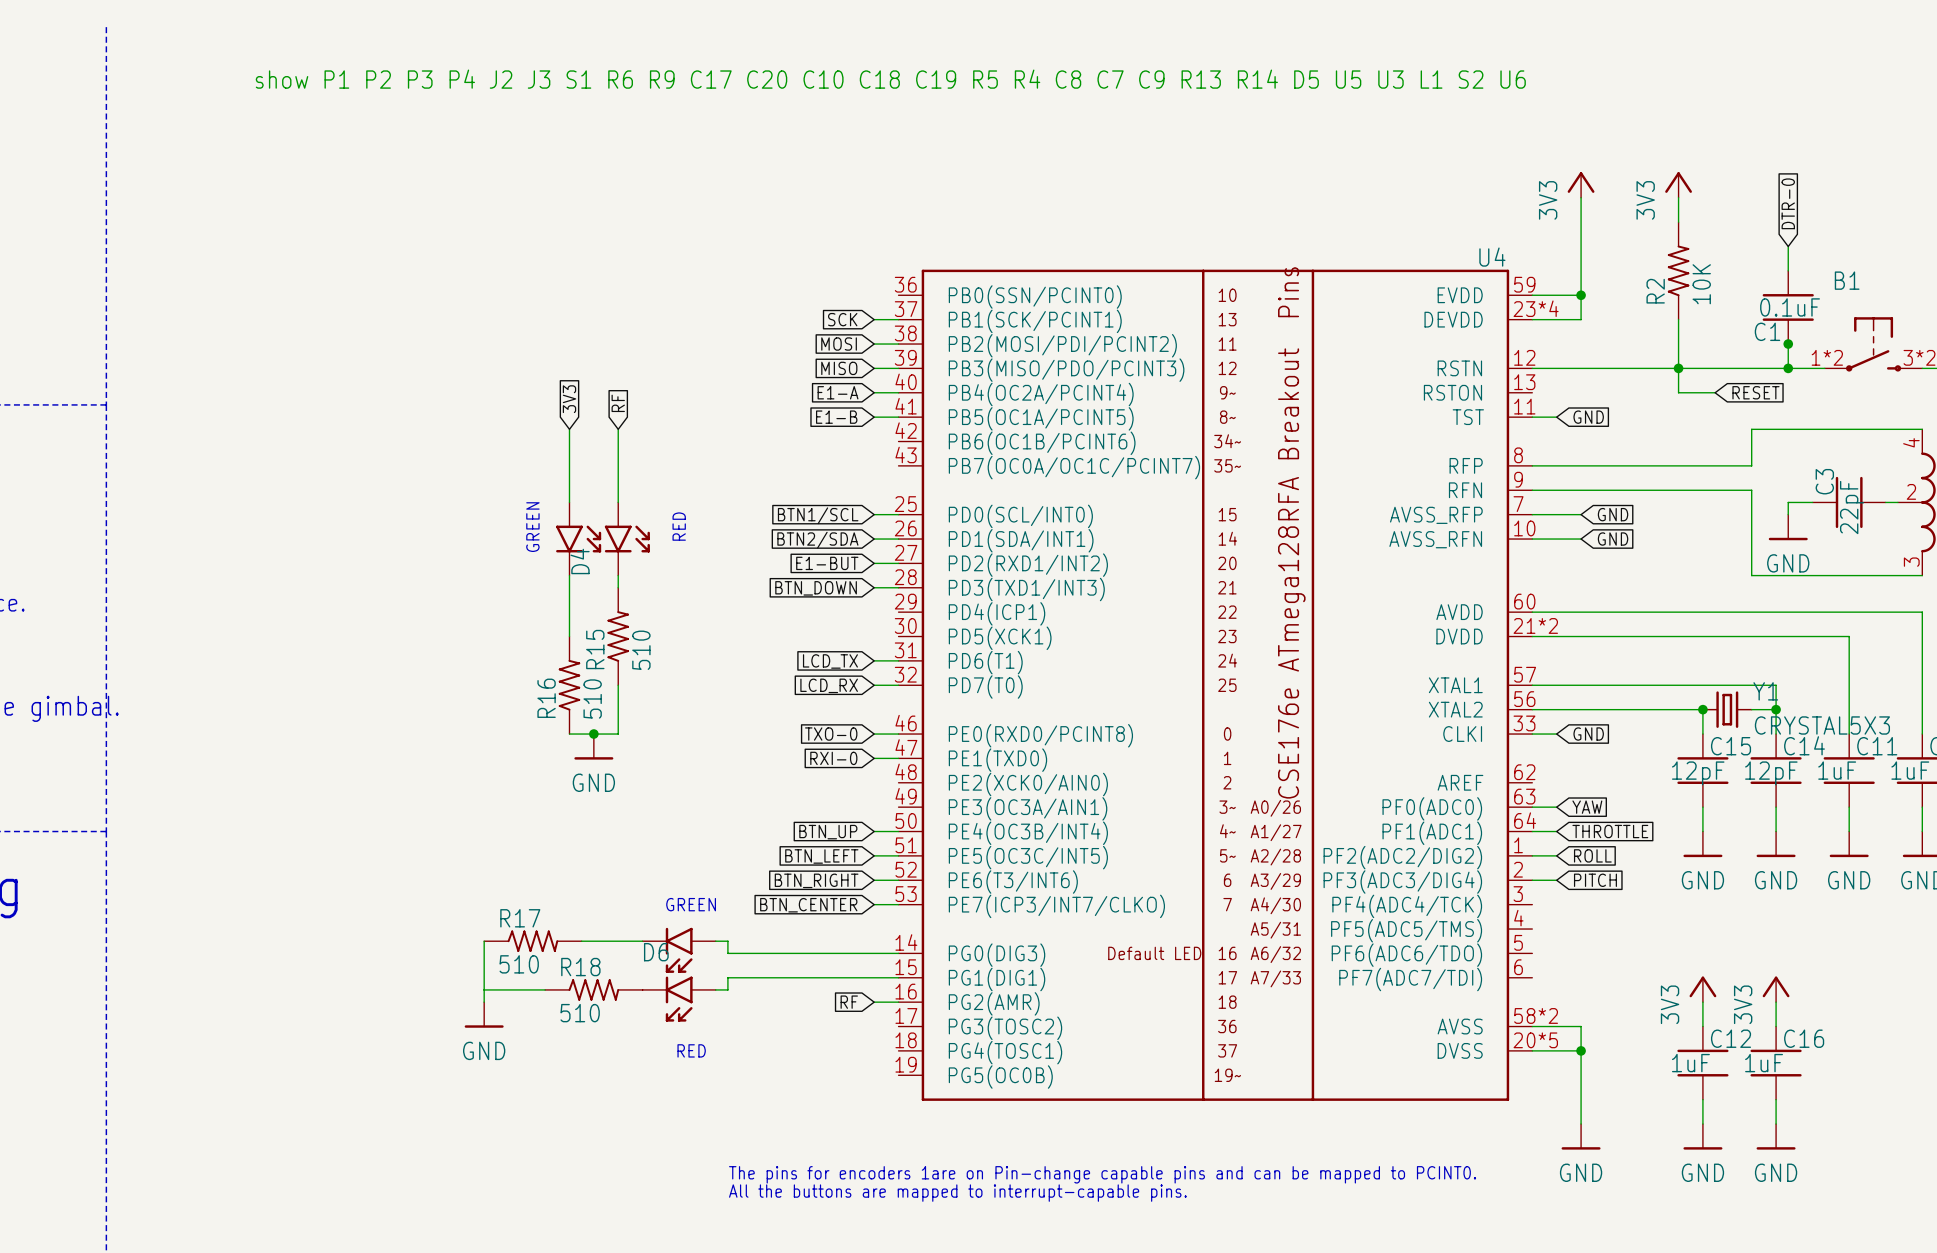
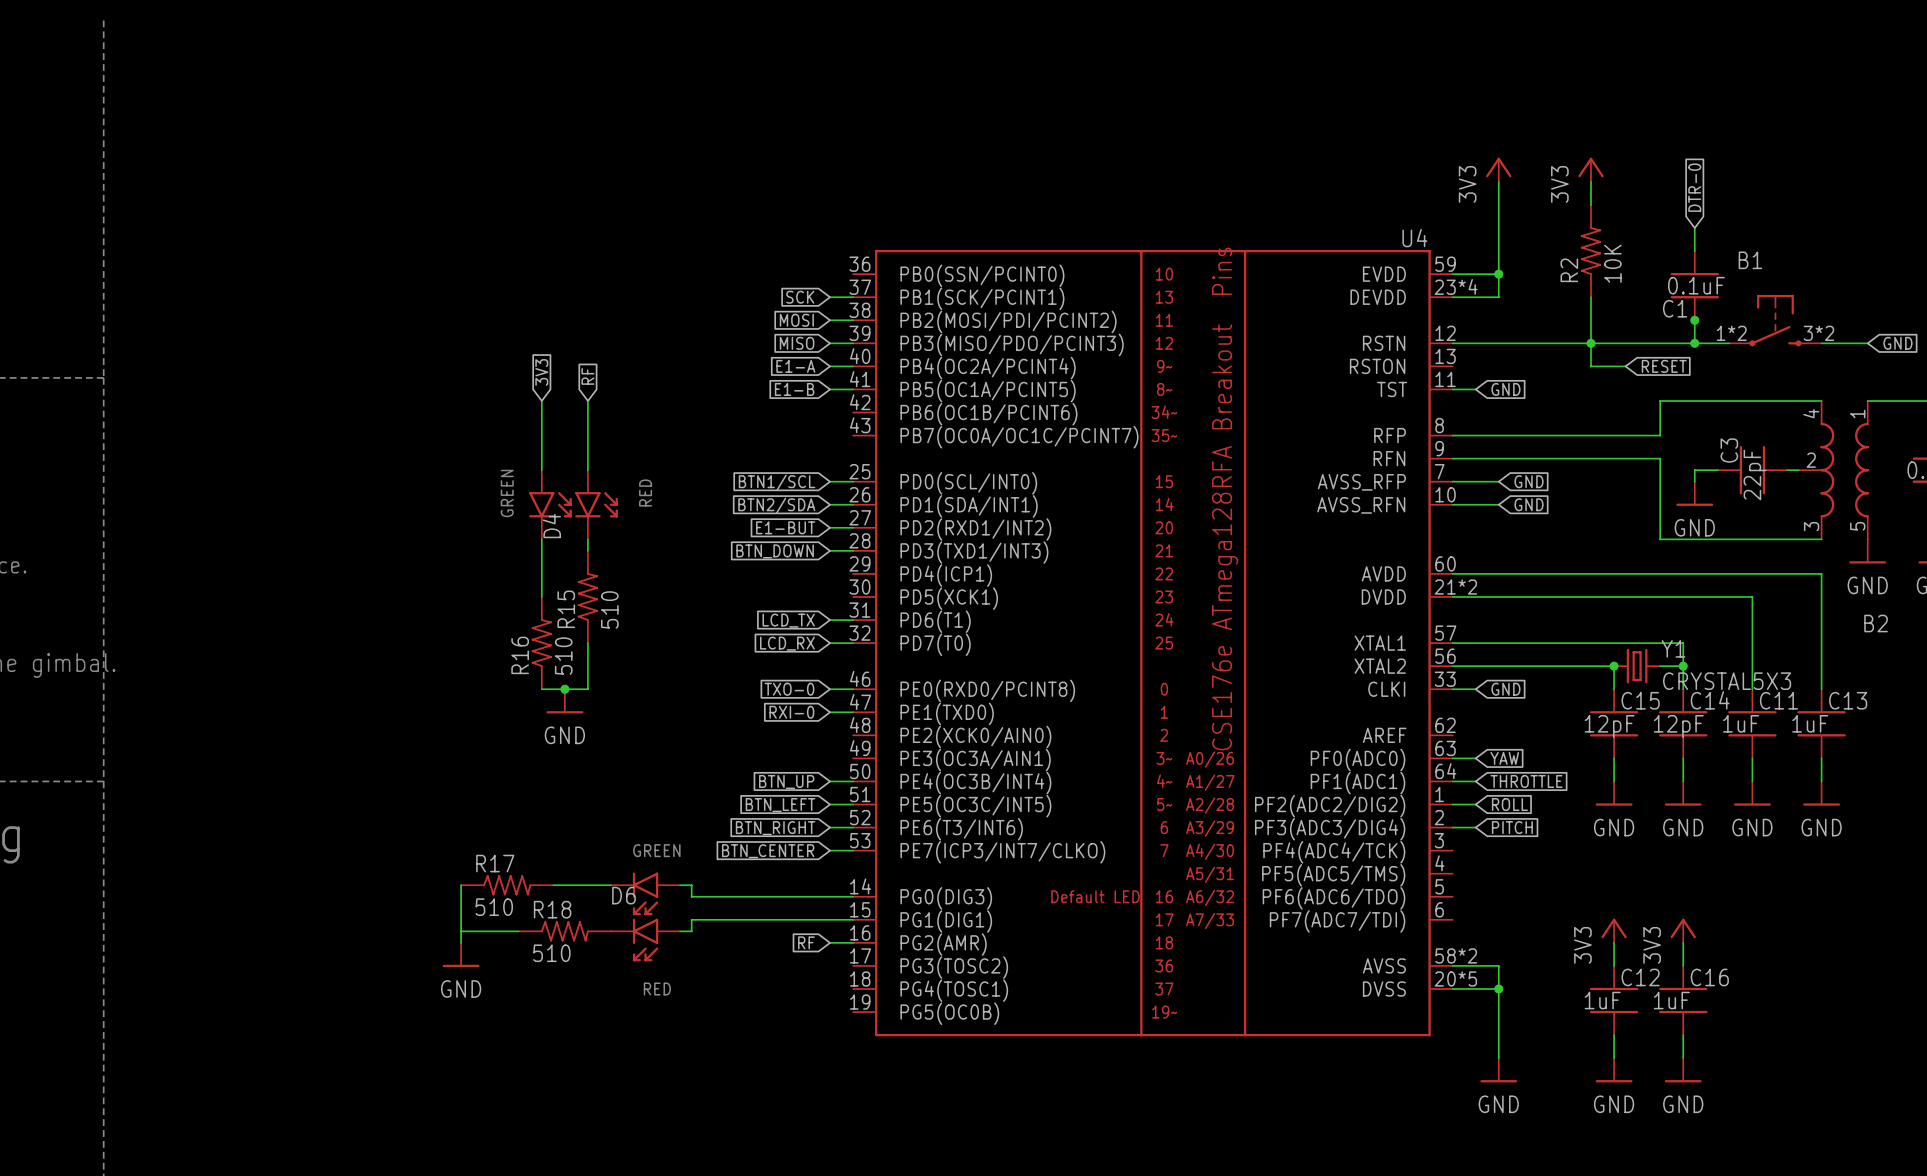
text: show P1 P2 P3 P4 J2 J3 S1 R6 R9 C17 C20 C10 C18 C19 R5 R4 C8 C7 C9 R13 R14 D5 U5 U3 L1 S2 U6 (890, 79) -> none
text: The pins for encoders 1are on Pin-change capable pins and can be mapped to PCINT0. (1102, 1174) -> none
text: All the buttons are mapped to interrupt-capable pins. (957, 1193) -> none

